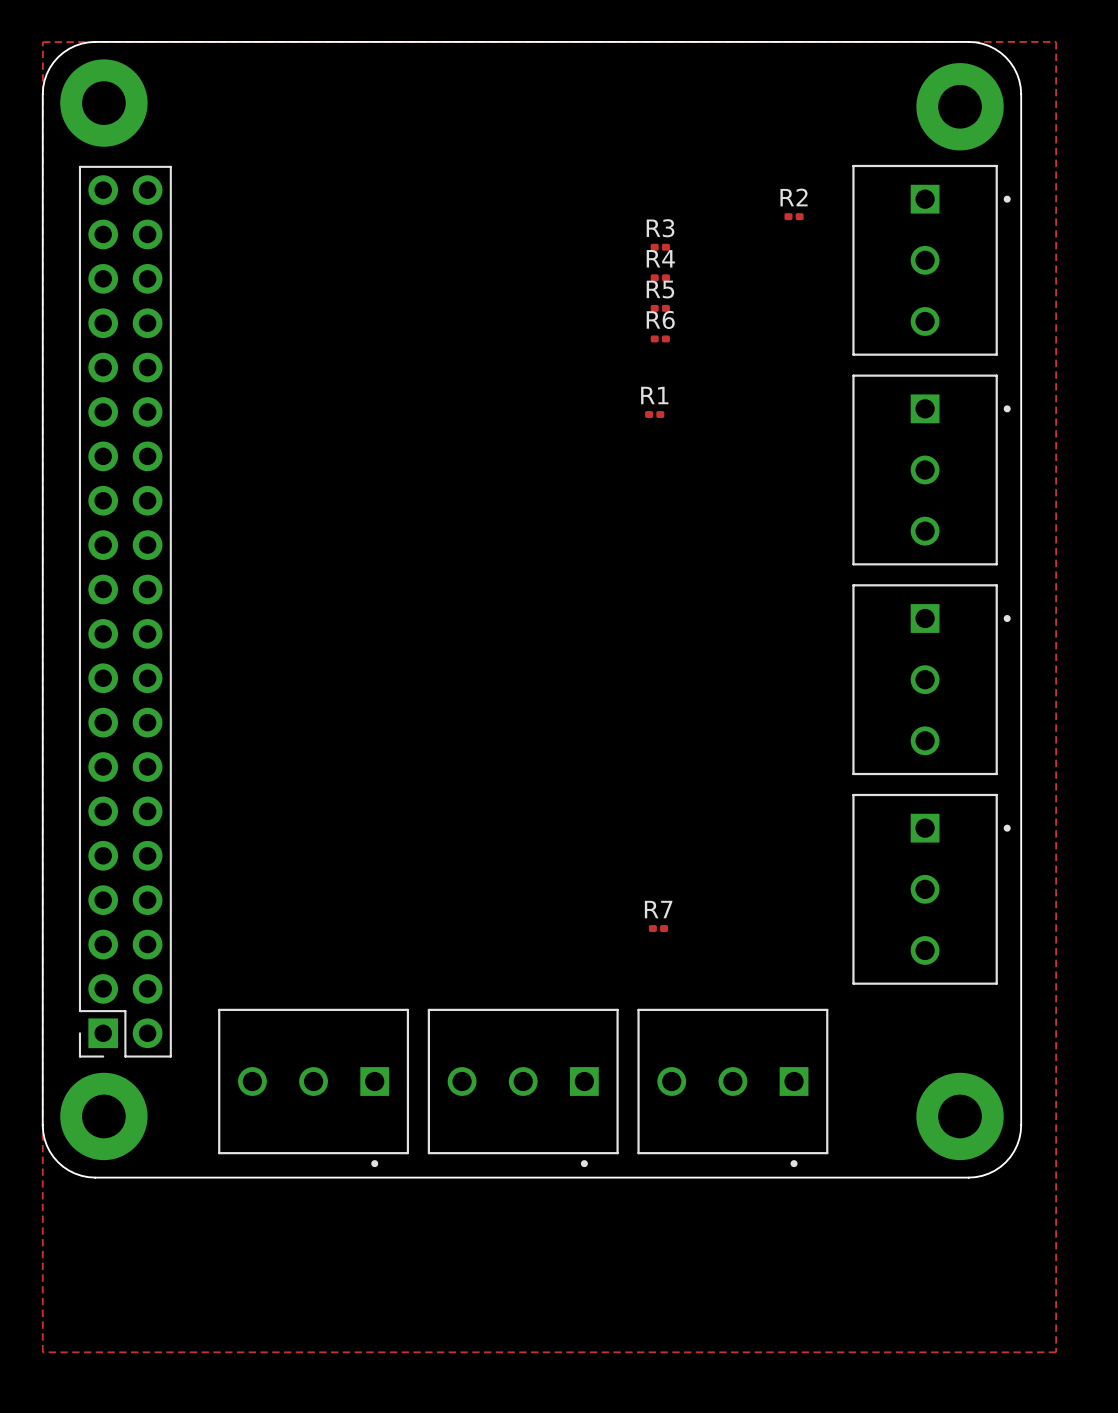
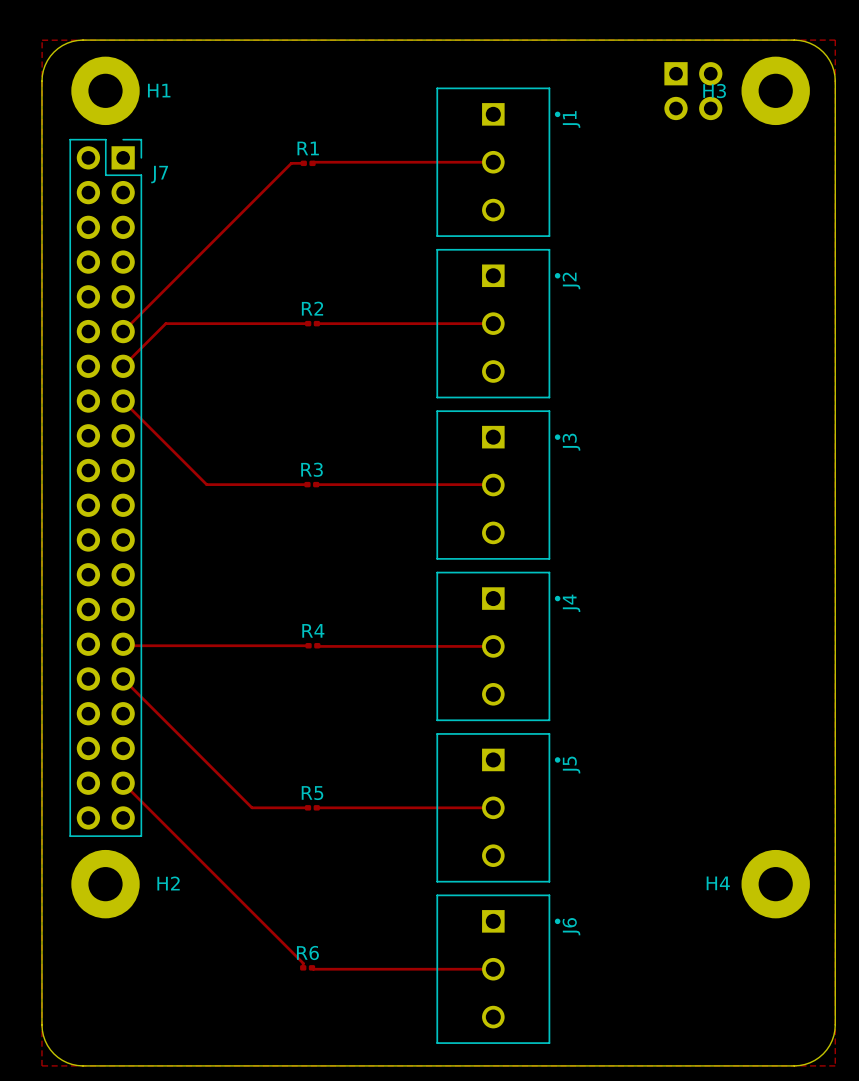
board edge: (968, 41) (988, 45) (1005, 57) (1017, 74) (1021, 94) (1021, 1125) (1017, 1145) (1010, 1157) (1000, 1166) (988, 1173) (968, 1177) (95, 1177) (75, 1173) (58, 1162) (46, 1145) (42, 1125) -> (766, 40) (799, 40) (814, 45) (829, 60) (835, 81) (835, 1024) (832, 1040) (826, 1049) (809, 1062) (794, 1065) (72, 1064) (62, 1060) (50, 1049) (42, 1030) (41, 888)
part: (103, 103) -> none
H1: none -> (105, 90)
part: (960, 106) -> none
H3: none -> (775, 90)
part: none -> (693, 91)
track: none -> (493, 162) (312, 163)
J1: none -> (498, 162)
track: none -> (303, 163) (291, 163) (123, 331)
R2 position: (794, 216) -> (312, 323)
R3 position: (660, 247) -> (311, 484)
part: (931, 260) -> none
R4 position: (660, 277) -> (312, 645)
R5 position: (660, 308) -> (312, 807)
R6 position: (660, 338) -> (307, 967)
track: none -> (308, 323) (165, 323) (123, 366)
track: none -> (316, 323) (493, 323)
J2: none -> (498, 323)
R1 position: (654, 414) -> (308, 163)
part: (931, 469) -> none
track: none -> (123, 401) (206, 484) (307, 484)
track: none -> (316, 484) (493, 485)
J3: none -> (498, 485)
part: (125, 611) -> none
J7: none -> (105, 487)
part: (931, 679) -> none
track: none -> (123, 644) (308, 645)
track: none -> (317, 645) (493, 646)
J4: none -> (498, 646)
track: none -> (123, 678) (252, 807) (308, 807)
part: (931, 889) -> none
R7: (658, 928) -> none
track: none -> (123, 783) (303, 963) (303, 967)
track: none -> (316, 807) (493, 807)
J5: none -> (498, 807)
part: (313, 1087) -> none
part: (523, 1087) -> none
part: (732, 1087) -> none
part: (103, 1116) -> none
part: (960, 1116) -> none
H2: none -> (105, 884)
H4: none -> (775, 884)
track: none -> (311, 967) (493, 969)
J6: none -> (498, 969)

